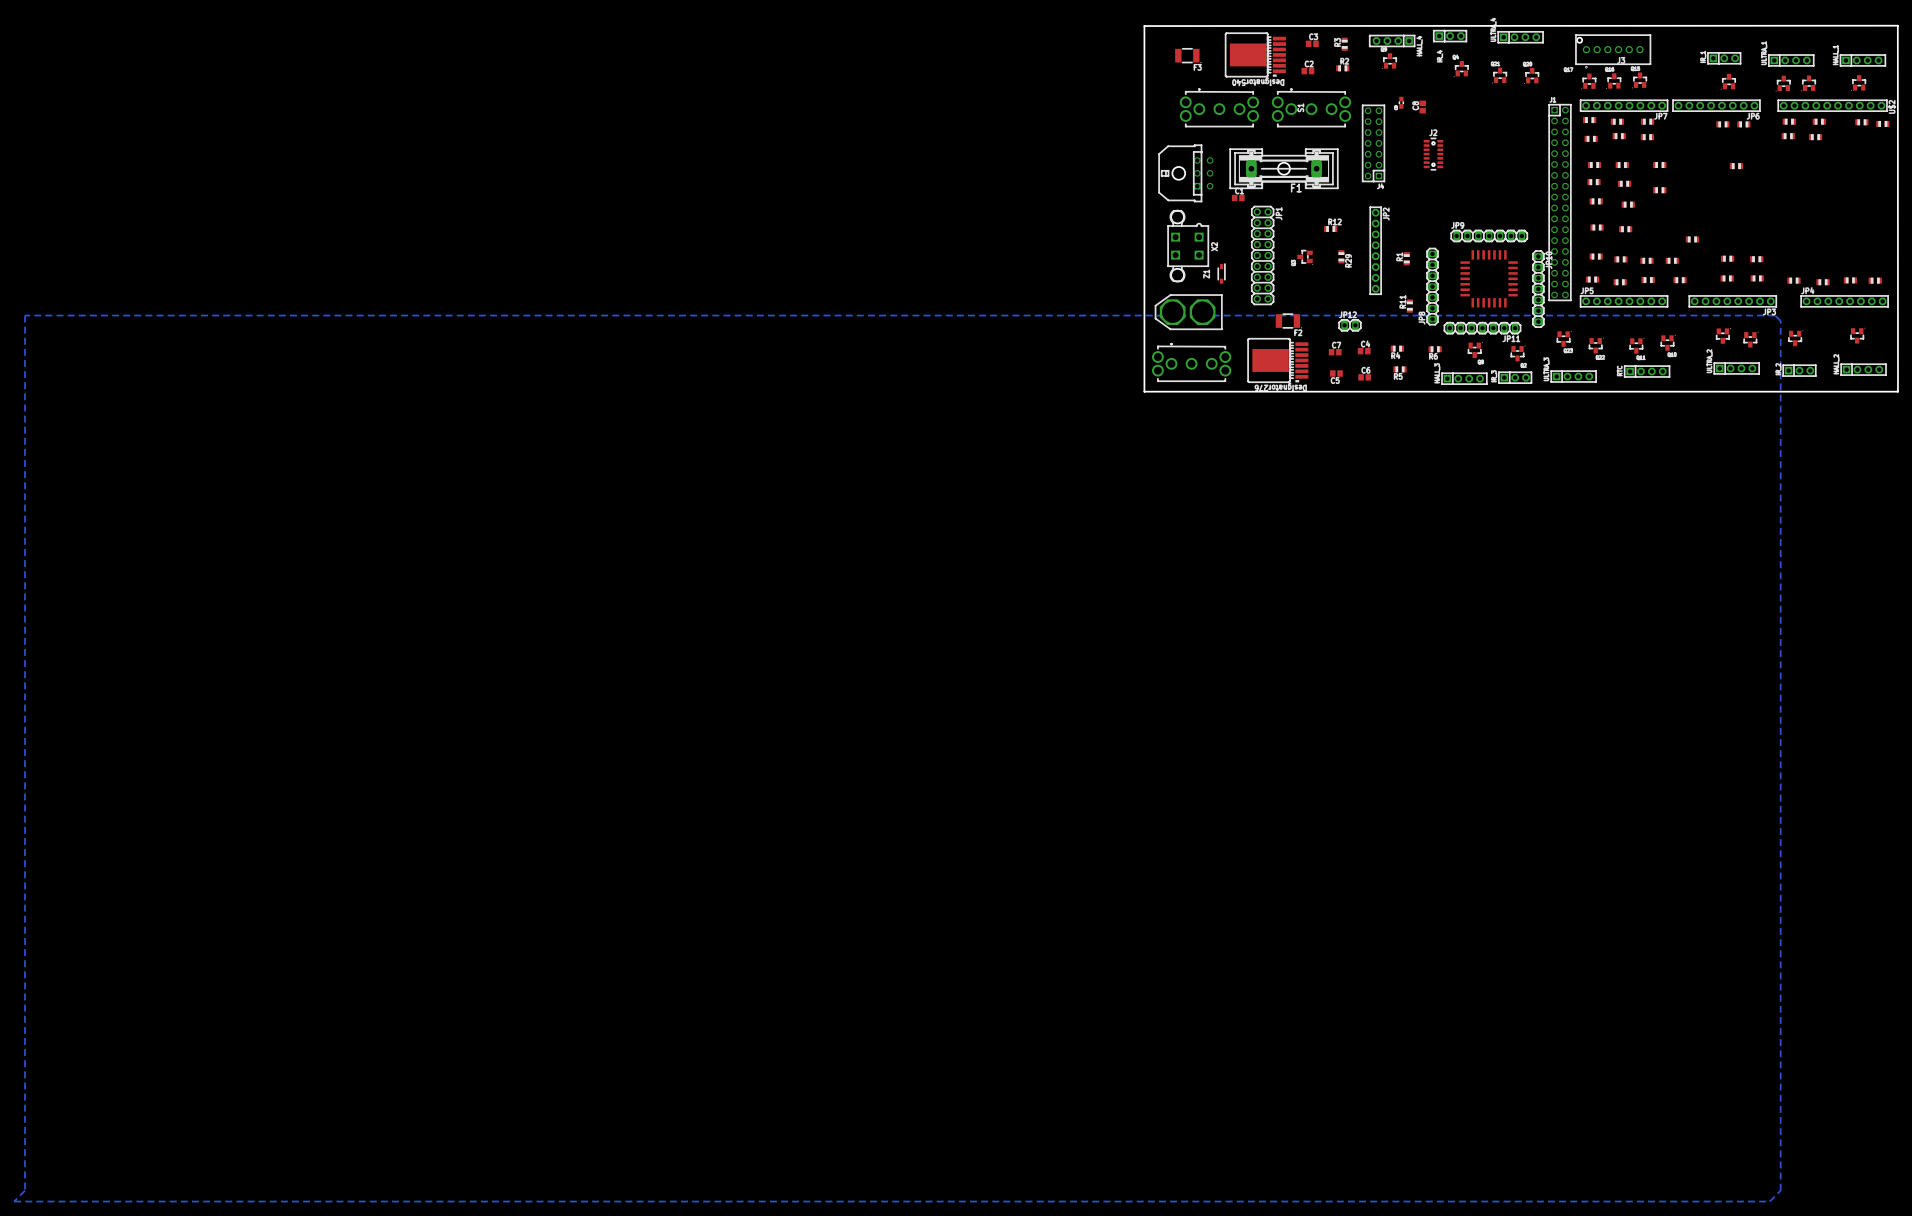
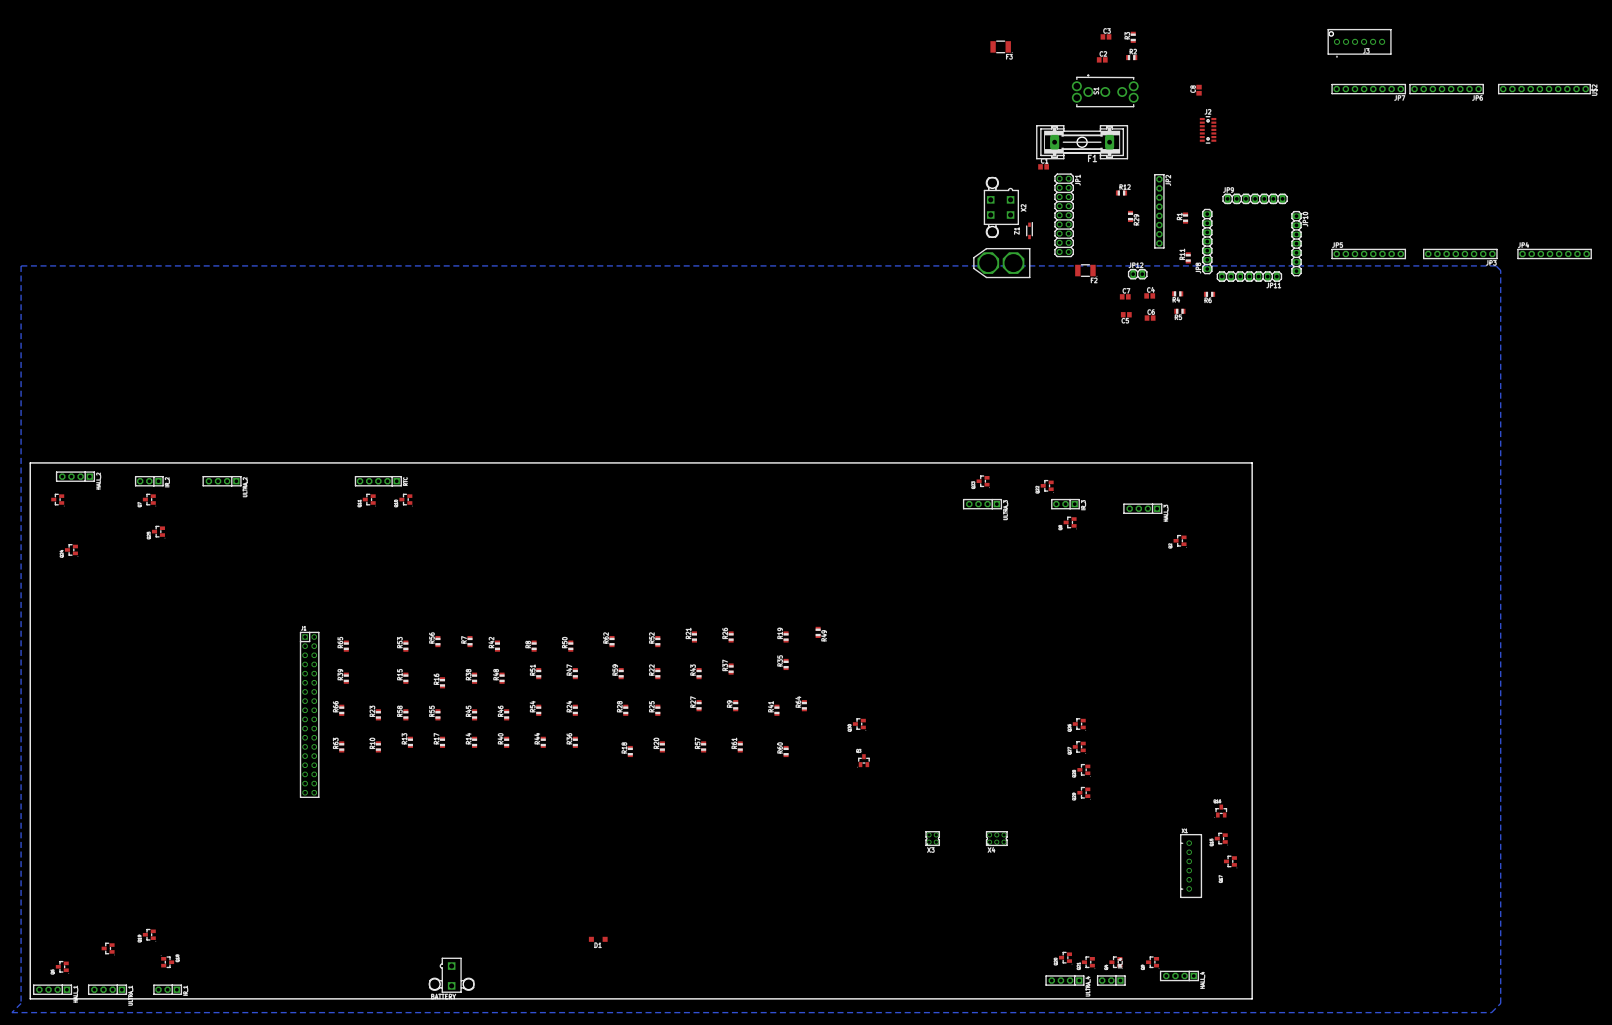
board edge: (1897, 25) (1144, 26) (1144, 391) (1897, 391) (1897, 25) -> none
part rotation: 0° (1450, 36) -> 180° (1111, 980)
part position: (1450, 36) -> (1111, 980)
part rotation: 0° (1520, 37) -> 180° (1064, 980)
part position: (1520, 37) -> (1064, 980)
part position: (1392, 40) -> (1179, 975)
part: (1255, 54) -> none
part rotation: 0° (1724, 58) -> 180° (167, 989)
part position: (1724, 58) -> (167, 989)
part rotation: 0° (1791, 60) -> 180° (107, 989)
part position: (1791, 60) -> (107, 989)
part rotation: 0° (1862, 60) -> 180° (52, 989)
part position: (1862, 60) -> (52, 989)
part rotation: 0° (1389, 61) -> 90° counterclockwise (1152, 962)
part position: (1389, 61) -> (1152, 962)
part rotation: 0° (1460, 68) -> 90° counterclockwise (1116, 962)
part position: (1460, 68) -> (1116, 962)
part rotation: 0° (1499, 75) -> 90° counterclockwise (1088, 962)
part position: (1499, 75) -> (1088, 962)
part rotation: 0° (1531, 75) -> 90° counterclockwise (1065, 958)
part position: (1531, 75) -> (1065, 958)
part rotation: 0° (1639, 80) -> 90° counterclockwise (1221, 839)
part position: (1639, 80) -> (1221, 839)
part rotation: 0° (1588, 81) -> 90° counterclockwise (1230, 862)
part position: (1588, 81) -> (1230, 862)
part position: (1613, 81) -> (1220, 811)
part: (1728, 81) -> none
part: (1782, 83) -> none
part: (1808, 83) -> none
part: (1858, 83) -> none
part: (1401, 102) -> none
part: (1219, 107) -> none
part: (1589, 120) -> none
part: (1617, 121) -> none
part: (1647, 121) -> none
part: (1789, 121) -> none
part: (1819, 121) -> none
part: (1861, 122) -> none
part: (1882, 123) -> none
part: (1722, 124) -> none
part: (1743, 124) -> none
part: (1619, 136) -> none
part: (1788, 136) -> none
part: (1647, 137) -> none
part: (1815, 137) -> none
part: (1591, 138) -> none
part: (1373, 143) -> none
part: (1594, 165) -> none
part: (1622, 165) -> none
part: (1659, 165) -> none
part: (1736, 166) -> none
part: (1185, 173) -> none
part: (1594, 182) -> none
part: (1624, 183) -> none
part: (1659, 190) -> none
part: (1596, 201) -> none
part position: (1560, 202) -> (309, 714)
part: (1628, 204) -> none
part: (1597, 227) -> none
part: (1625, 229) -> none
part: (1692, 239) -> none
part: (1596, 256) -> none
part rotation: 0° (1305, 257) -> 90° clockwise (863, 760)
part position: (1305, 257) -> (863, 760)
part: (1727, 258) -> none
part: (1620, 259) -> none
part: (1756, 259) -> none
part: (1646, 260) -> none
part: (1672, 260) -> none
part: (1489, 278) -> none
part: (1727, 278) -> none
part: (1757, 278) -> none
part: (1592, 279) -> none
part: (1648, 280) -> none
part: (1680, 280) -> none
part: (1793, 280) -> none
part: (1850, 280) -> none
part: (1875, 280) -> none
part: (1620, 282) -> none
part: (1823, 282) -> none
part: (1723, 335) -> none
part: (1858, 335) -> none
part rotation: 0° (1564, 338) -> 90° clockwise (983, 481)
part position: (1564, 338) -> (983, 481)
part: (1795, 338) -> none
part: (1751, 339) -> none
part rotation: 0° (1668, 342) -> 90° clockwise (406, 500)
part position: (1668, 342) -> (406, 500)
part rotation: 0° (1596, 345) -> 90° clockwise (1047, 486)
part position: (1596, 345) -> (1047, 486)
part rotation: 0° (1637, 345) -> 90° clockwise (369, 500)
part position: (1637, 345) -> (369, 500)
part rotation: 0° (1475, 350) -> 90° clockwise (1070, 523)
part position: (1475, 350) -> (1070, 523)
part rotation: 0° (1518, 353) -> 90° clockwise (1180, 541)
part position: (1518, 353) -> (1180, 541)
part: (1278, 360) -> none
part: (1191, 362) -> none
part rotation: 0° (1736, 368) -> 180° (222, 481)
part position: (1736, 368) -> (222, 481)
part rotation: 0° (1863, 369) -> 180° (75, 476)
part position: (1863, 369) -> (75, 476)
part rotation: 0° (1799, 370) -> 180° (149, 481)
part position: (1799, 370) -> (149, 481)
part: (1647, 371) -> none
part rotation: 0° (1573, 376) -> 180° (982, 504)
part position: (1573, 376) -> (982, 504)
part rotation: 0° (1515, 377) -> 180° (1065, 504)
part position: (1515, 377) -> (1065, 504)
part rotation: 0° (1464, 378) -> 180° (1142, 508)
part position: (1464, 378) -> (1142, 508)
board edge: none -> (30, 462) (1252, 462) (1252, 998) (30, 998) (30, 462)
part: none -> (378, 481)
part: none -> (57, 500)
part: none -> (149, 500)
part: none -> (158, 532)
part: none -> (71, 550)
part: none -> (818, 632)
part: none -> (694, 636)
part: none -> (731, 636)
part: none -> (786, 636)
part: none -> (437, 641)
part: none -> (469, 641)
part: none -> (612, 641)
part: none -> (657, 641)
part: none -> (346, 646)
part: none -> (405, 646)
part: none -> (497, 646)
part: none -> (534, 646)
part: none -> (570, 646)
part: none -> (786, 664)
part: none -> (731, 669)
part: none -> (538, 673)
part: none -> (575, 673)
part: none -> (621, 673)
part: none -> (657, 673)
part: none -> (699, 673)
part: none -> (346, 678)
part: none -> (405, 678)
part: none -> (474, 678)
part: none -> (502, 678)
part: none -> (442, 682)
part: none -> (699, 705)
part: none -> (735, 705)
part: none -> (804, 705)
part: none -> (341, 710)
part: none -> (538, 710)
part: none -> (575, 710)
part: none -> (625, 710)
part: none -> (657, 710)
part: none -> (776, 710)
part: none -> (378, 714)
part: none -> (405, 714)
part: none -> (437, 714)
part: none -> (474, 714)
part: none -> (506, 714)
part: none -> (859, 724)
part: none -> (1079, 724)
part: none -> (410, 742)
part: none -> (442, 742)
part: none -> (474, 742)
part: none -> (506, 742)
part: none -> (543, 742)
part: none -> (575, 742)
part: none -> (341, 746)
part: none -> (378, 746)
part: none -> (662, 746)
part: none -> (703, 746)
part: none -> (740, 746)
part: none -> (1079, 747)
part: none -> (630, 751)
part: none -> (786, 751)
part: none -> (1084, 770)
part: none -> (1084, 793)
part: none -> (932, 838)
part: none -> (996, 838)
part: none -> (1191, 866)
part: none -> (149, 935)
part: none -> (598, 939)
part: none -> (108, 949)
part: none -> (167, 961)
part: none -> (62, 967)
part: none -> (451, 975)

